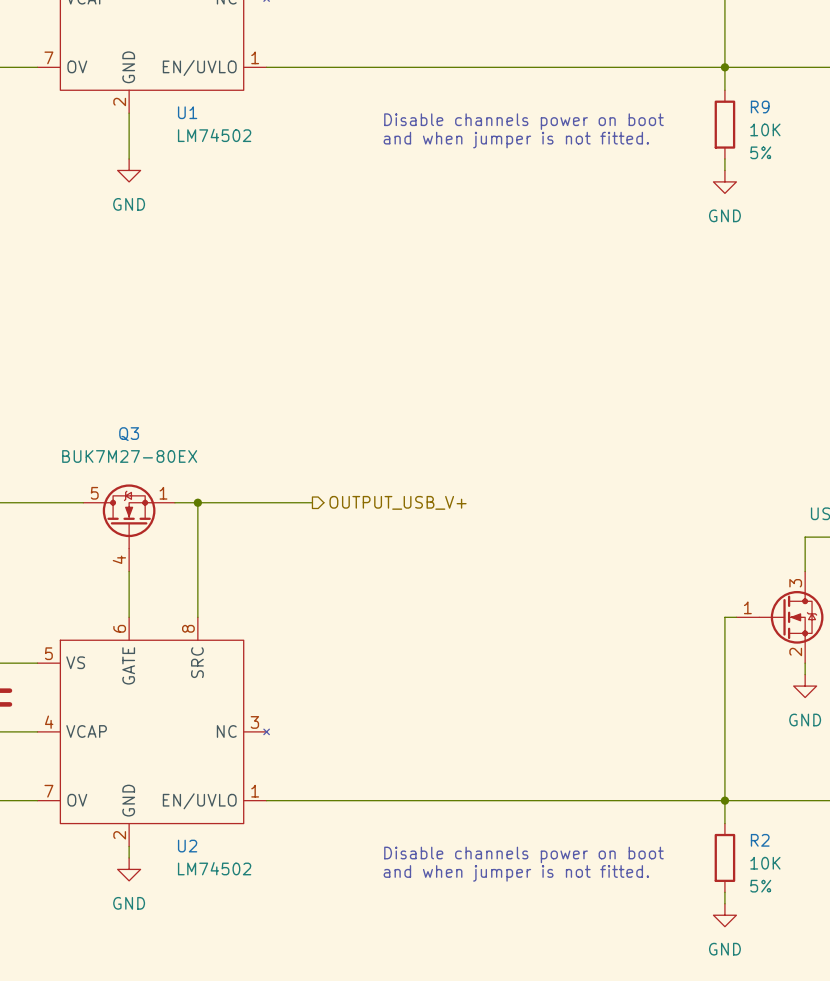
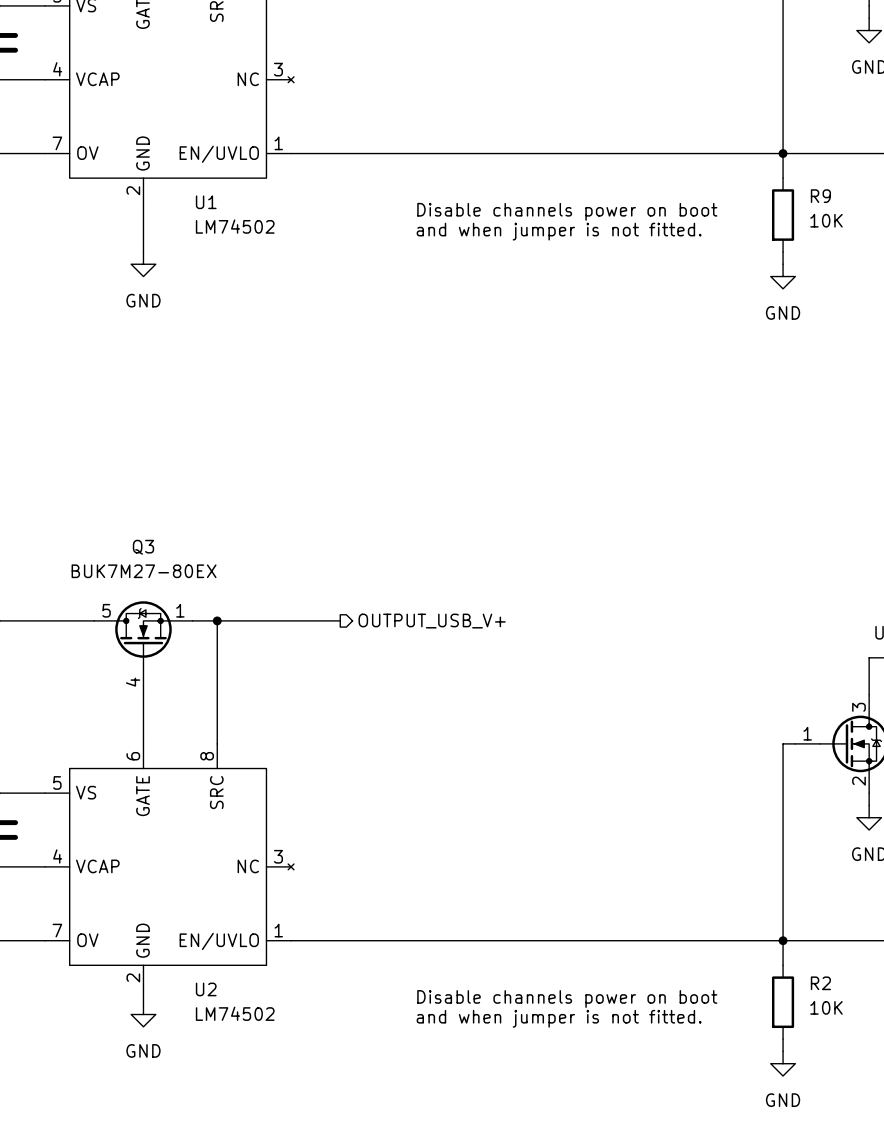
R9 text: 5% (760, 152) -> none
R2 text: 5% (760, 886) -> none

